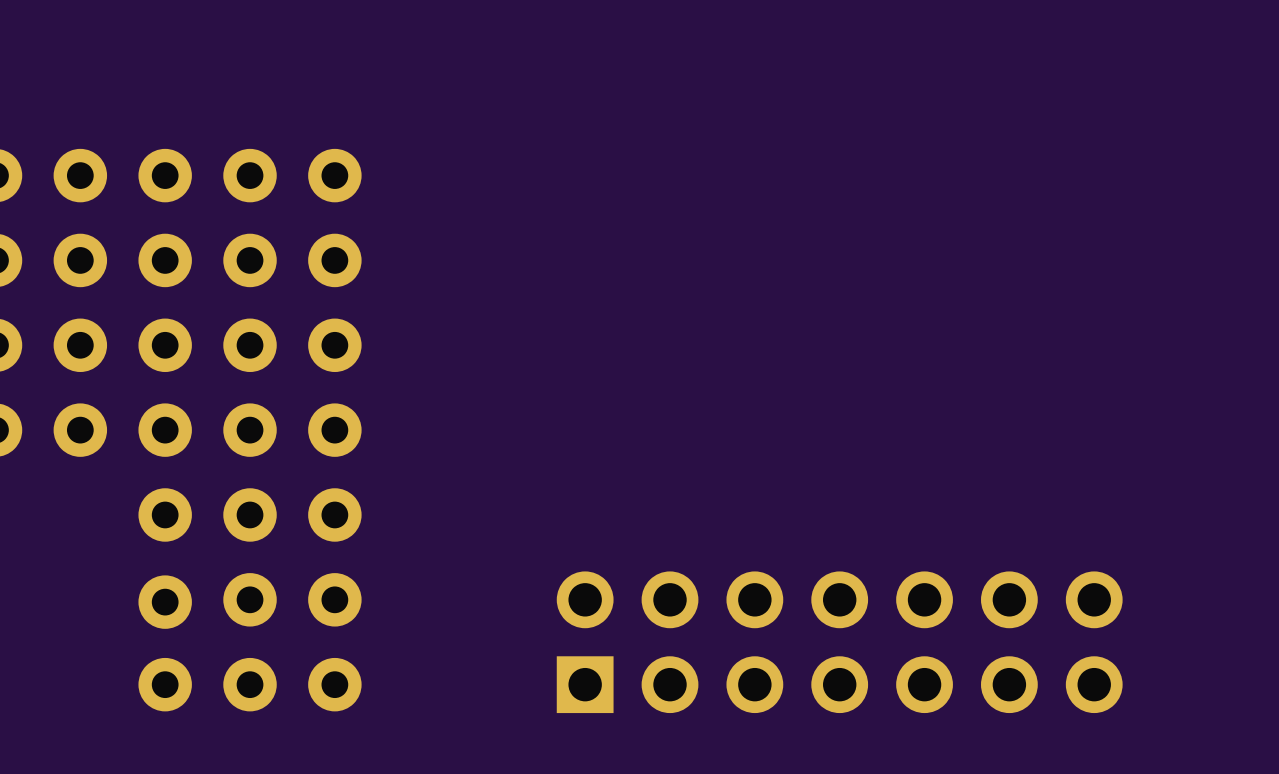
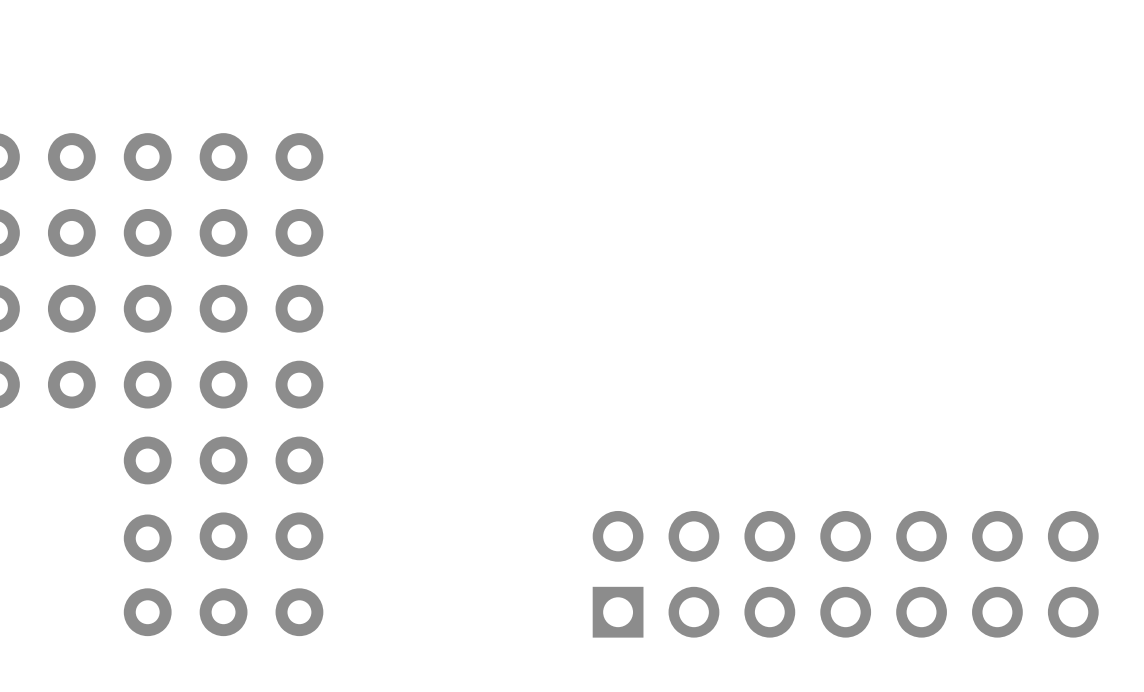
part position: (839, 642) -> (845, 574)

